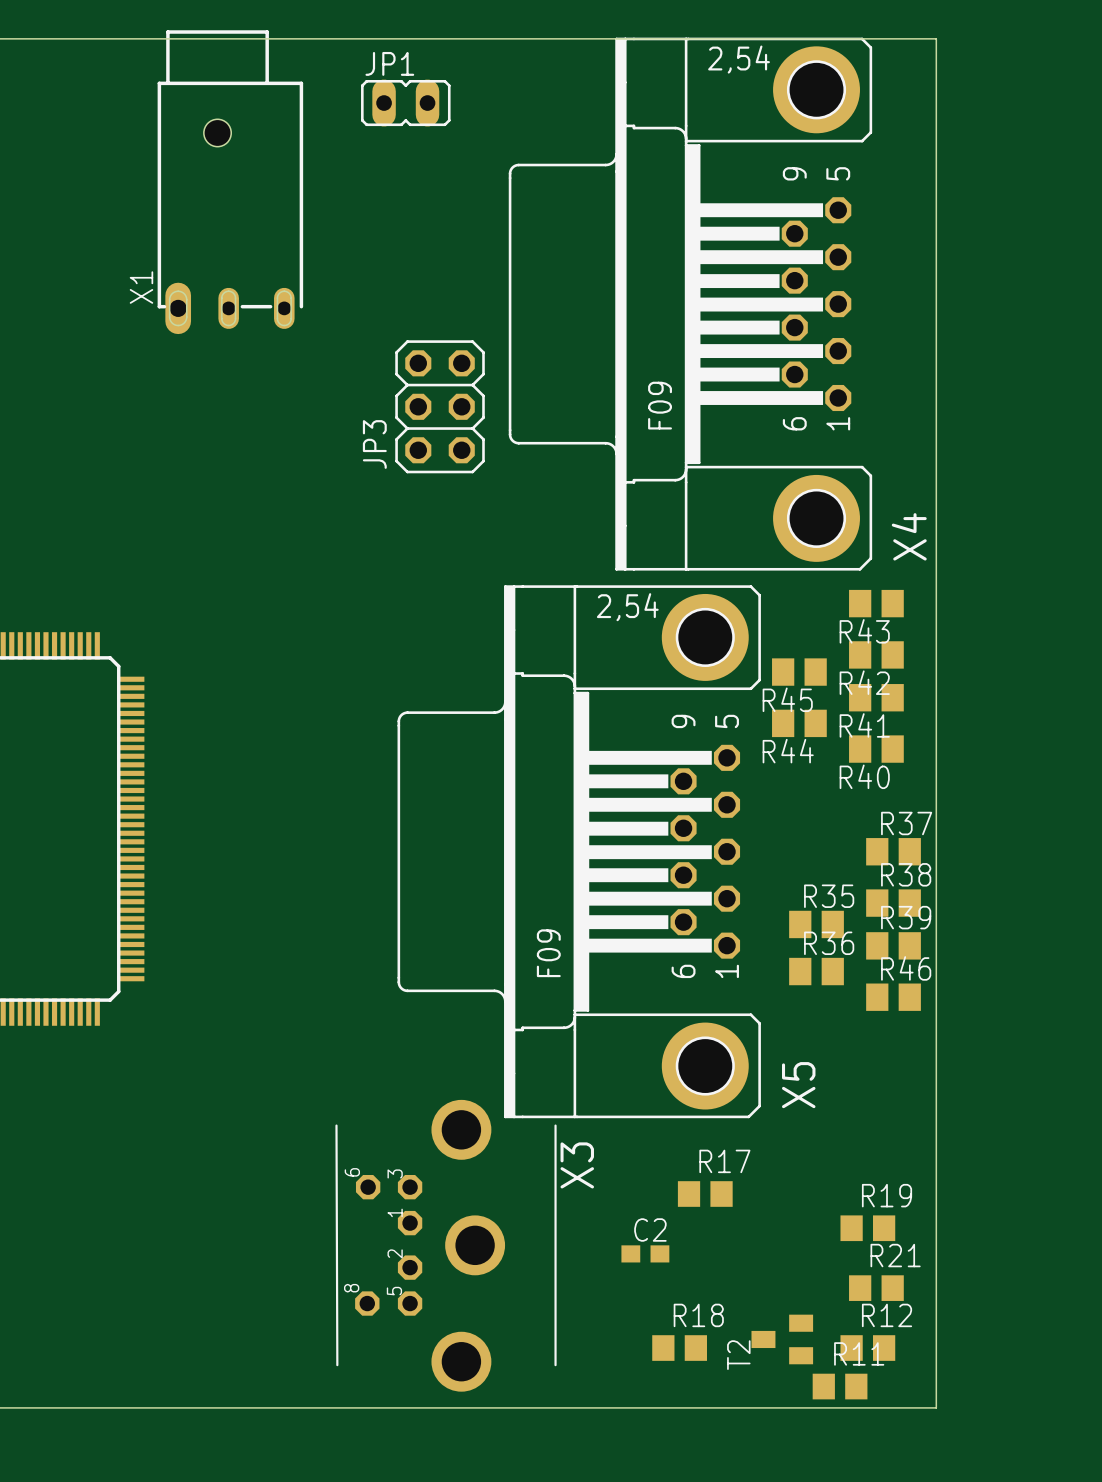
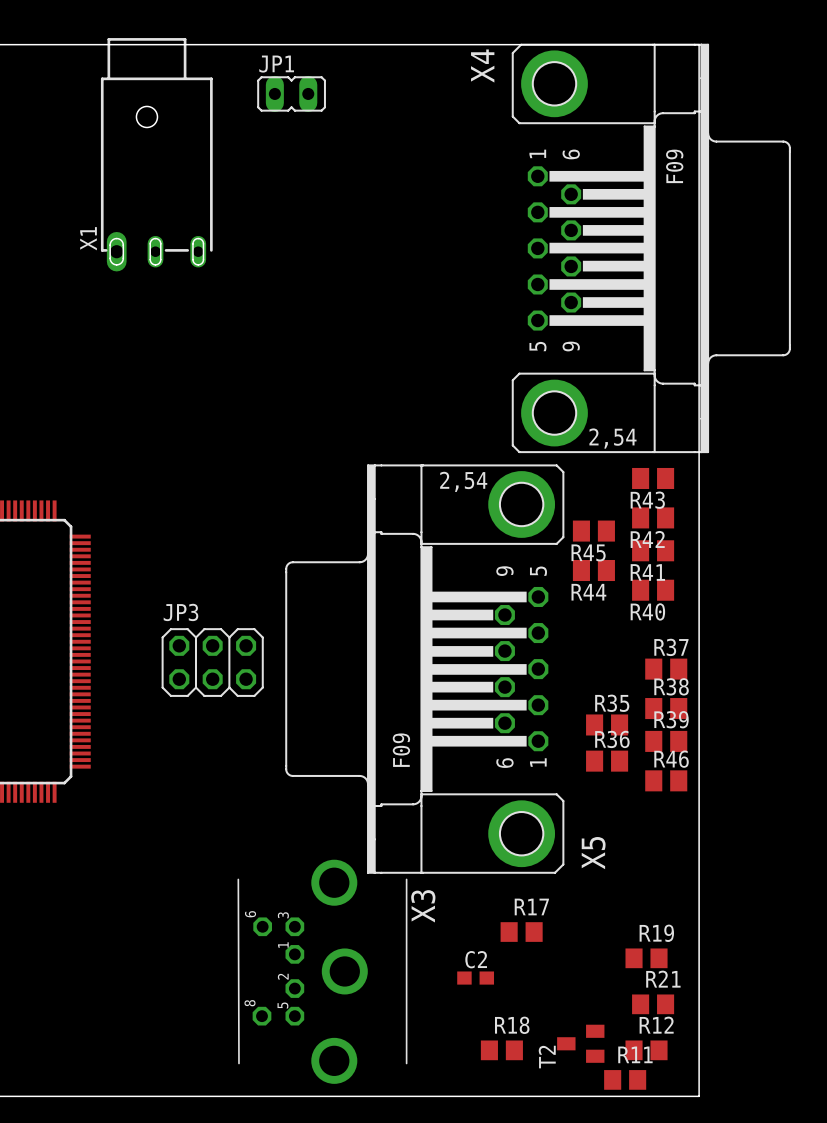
X4 footprint: [508, 37, 873, 571] -> [511, 43, 791, 454]
JP3 rotation: 0° (440, 406) -> 90° clockwise (212, 662)
JP3 position: (440, 406) -> (212, 662)
X4 name position: X4 (909, 536) -> X4 (482, 66)

